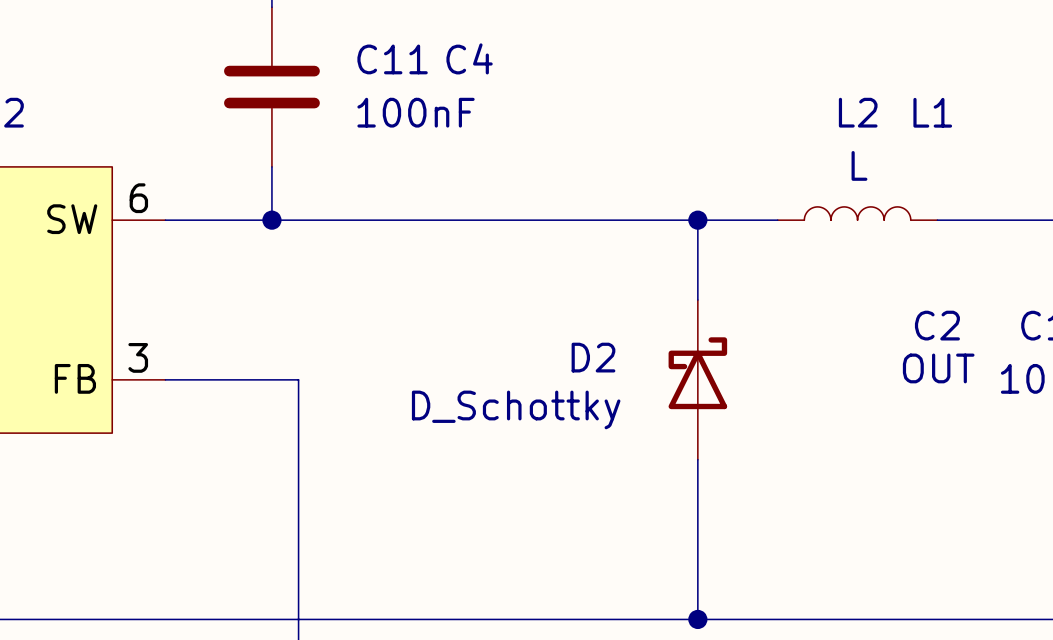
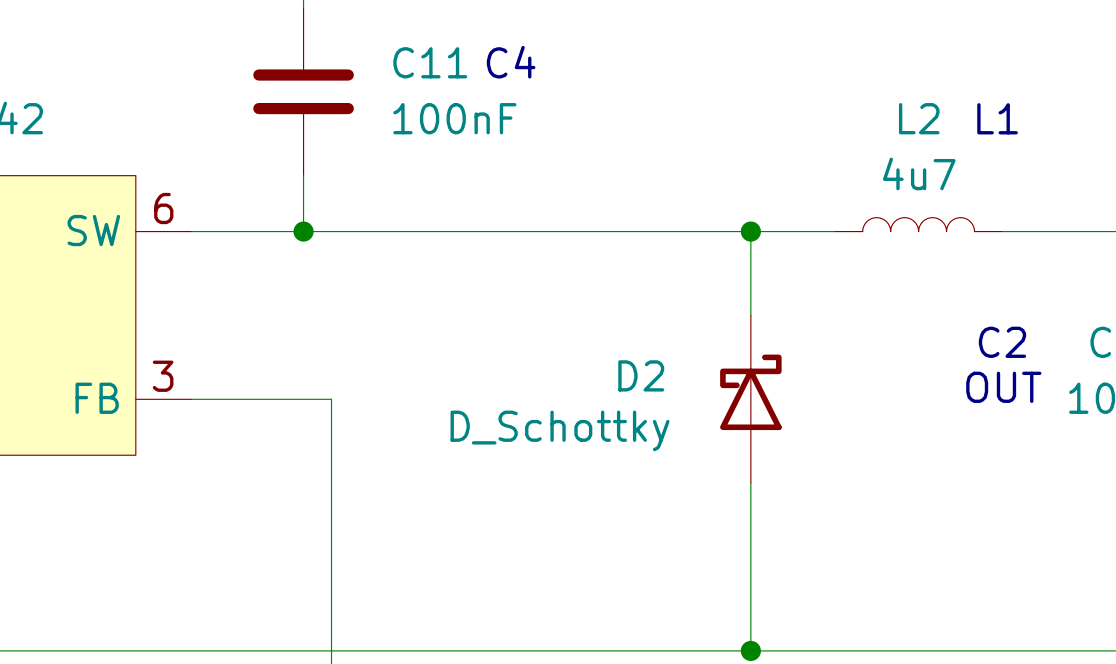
L2 value: L (859, 165) -> 4u7 (919, 173)

